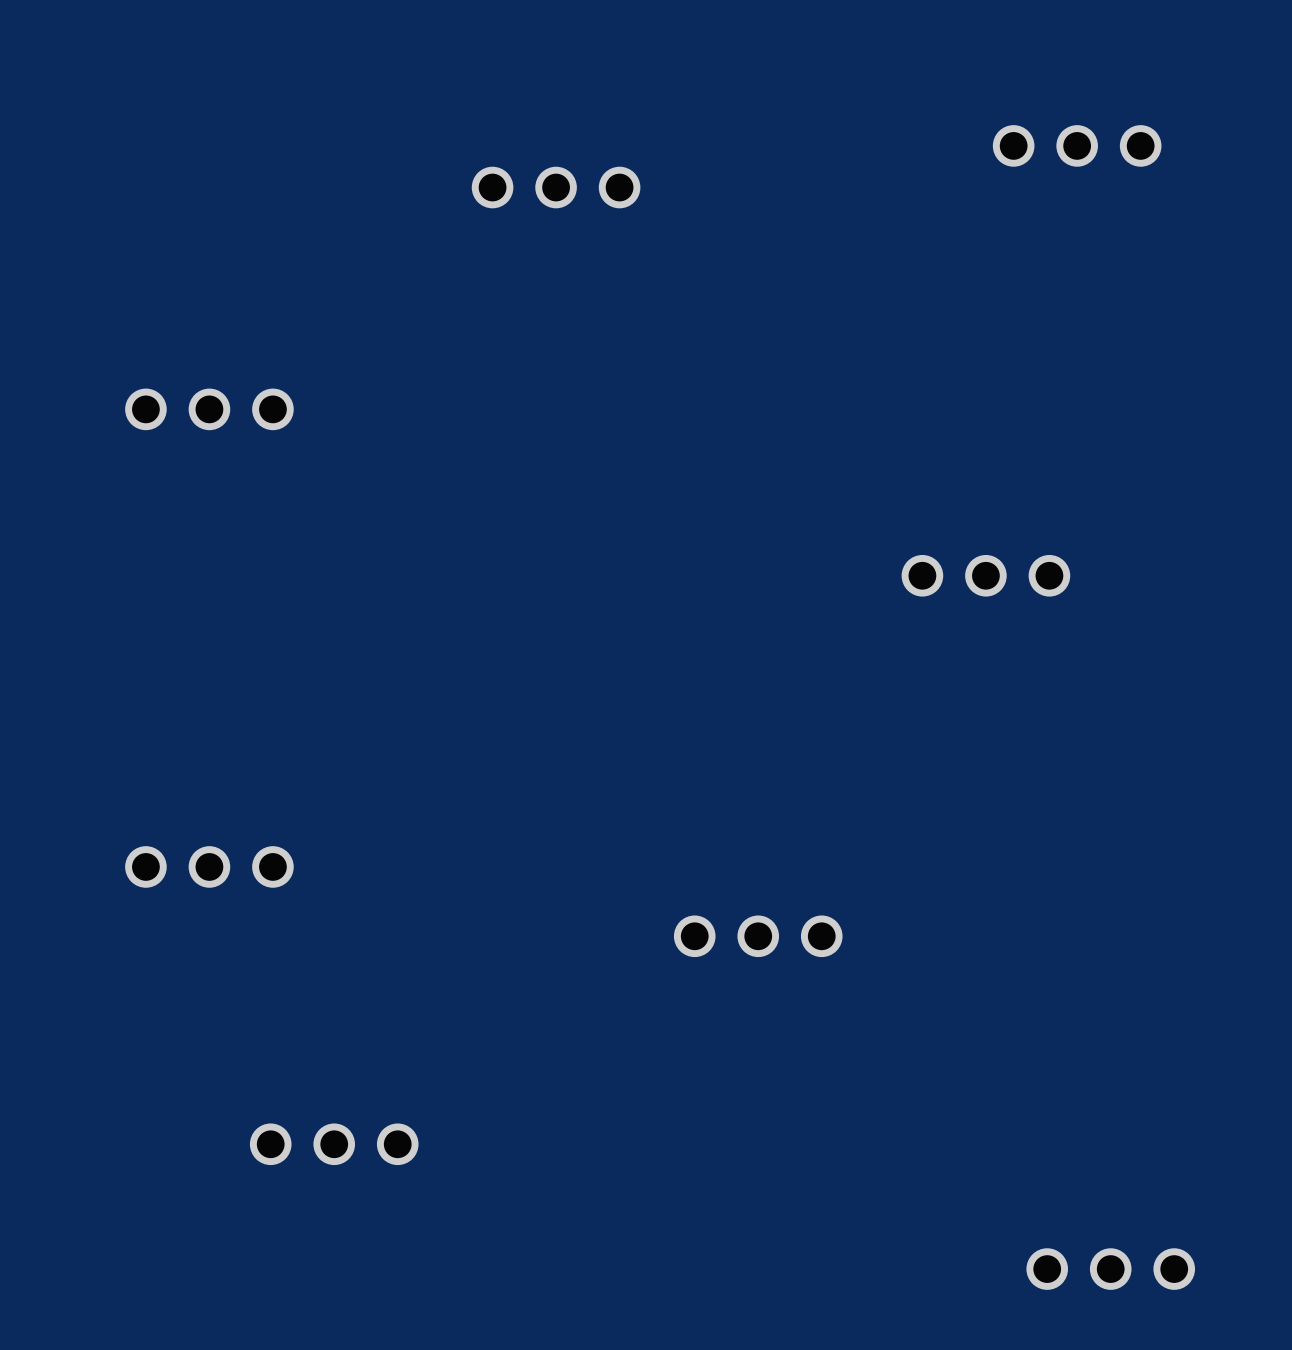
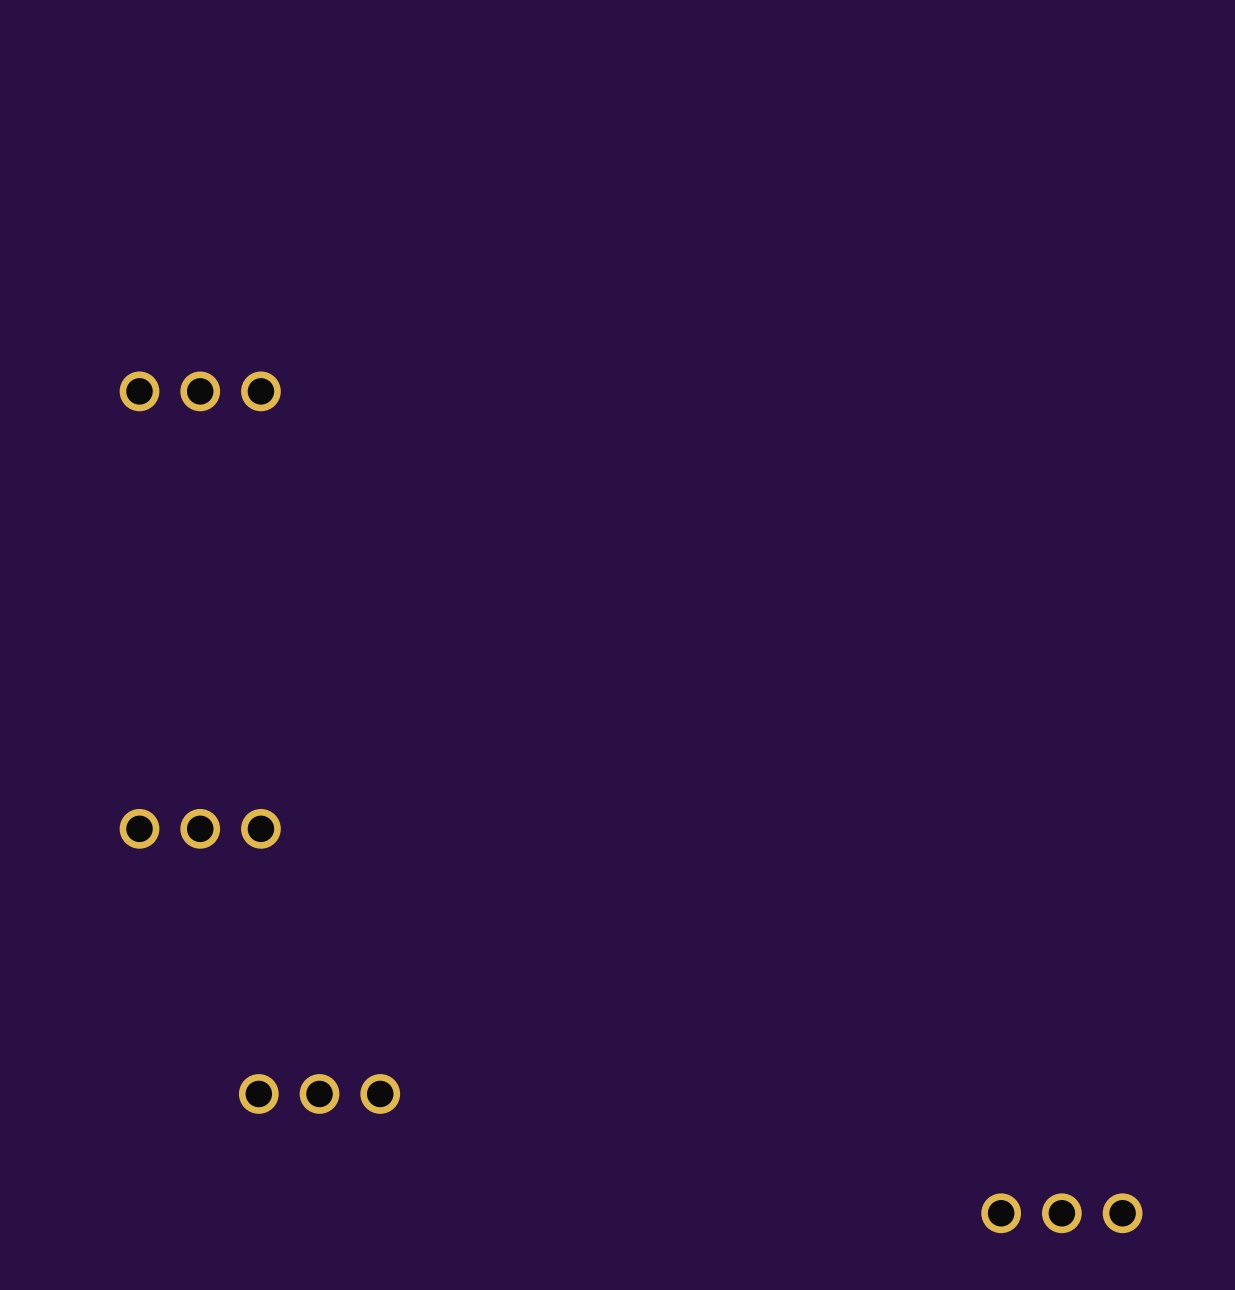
part: (1077, 145) -> none
part: (556, 187) -> none
part: (985, 575) -> none
part: (758, 936) -> none

